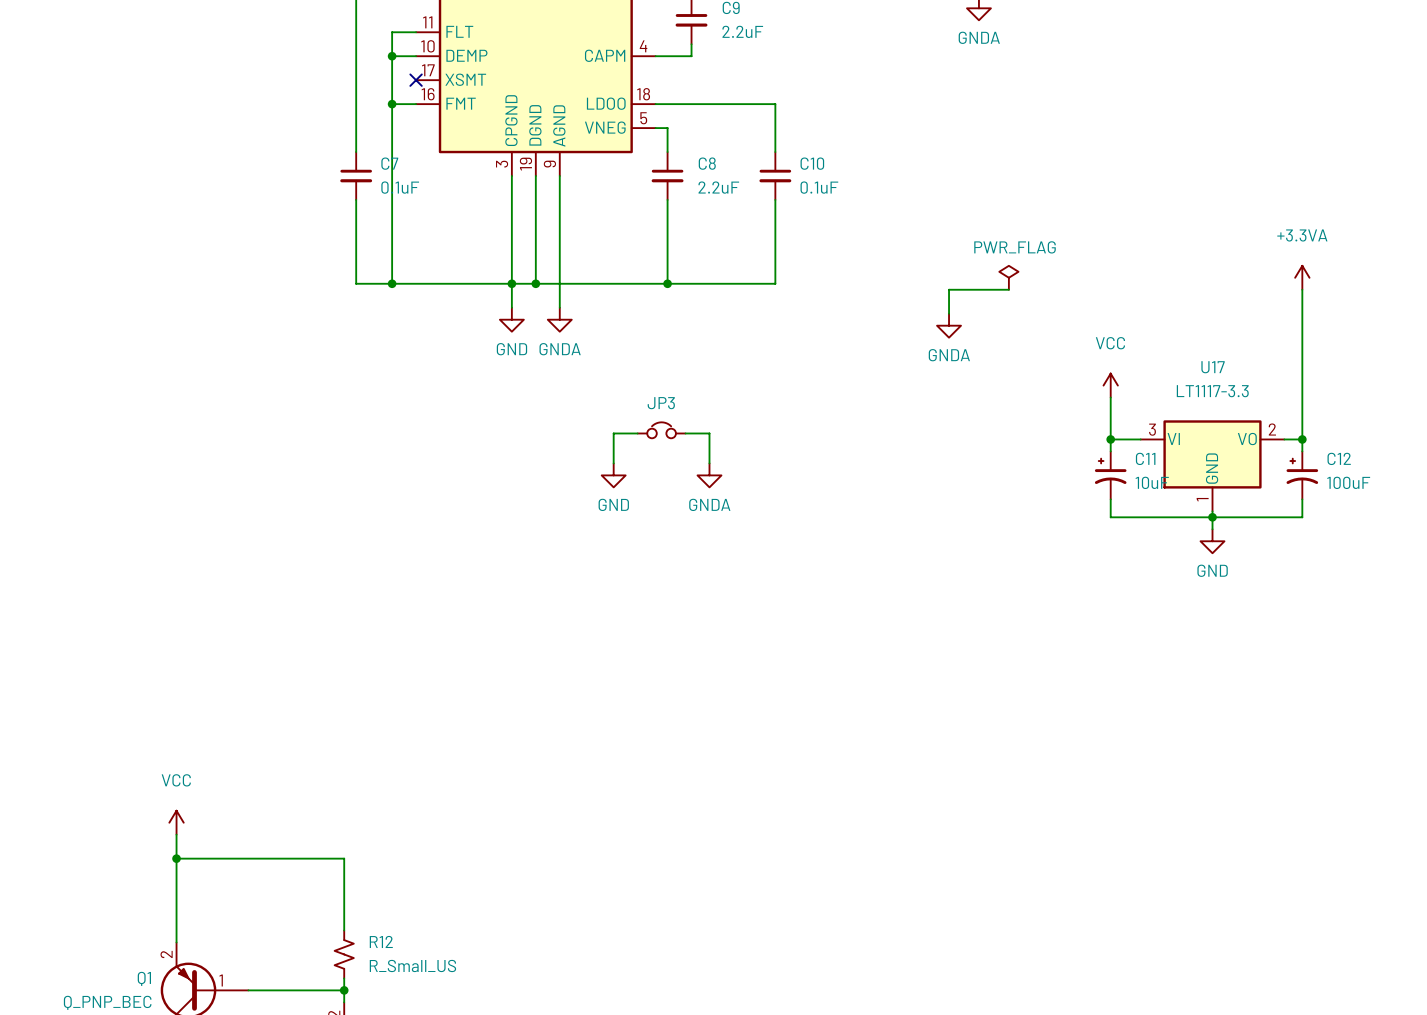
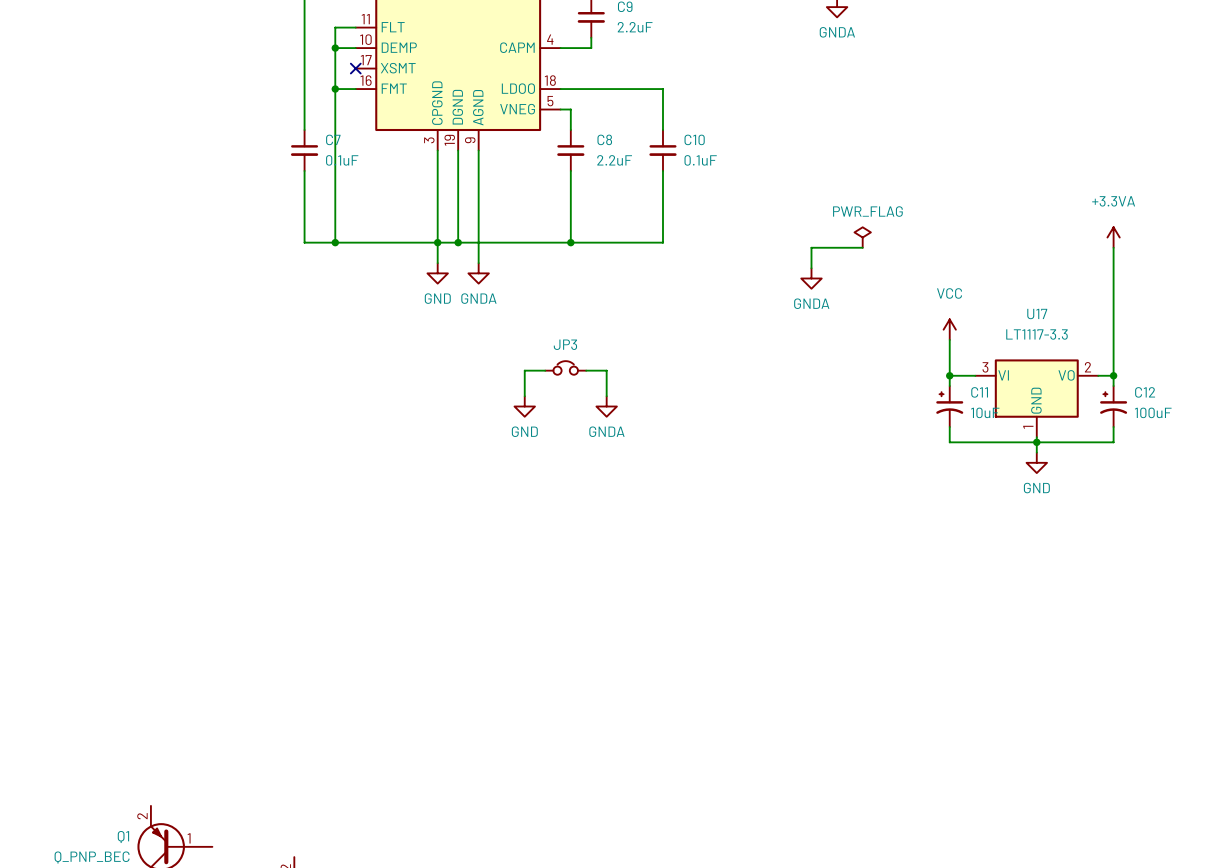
power symbol: VCC (176, 822) -> none
wire: (176, 834) (176, 942) -> none
wire: (176, 858) (344, 858) (344, 930) -> none
junction: (176, 858) -> none
R12: R_Small_US (344, 954) -> none
wire: (344, 978) (344, 1002) -> none
wire: (248, 990) (344, 990) -> none
junction: (344, 990) -> none

